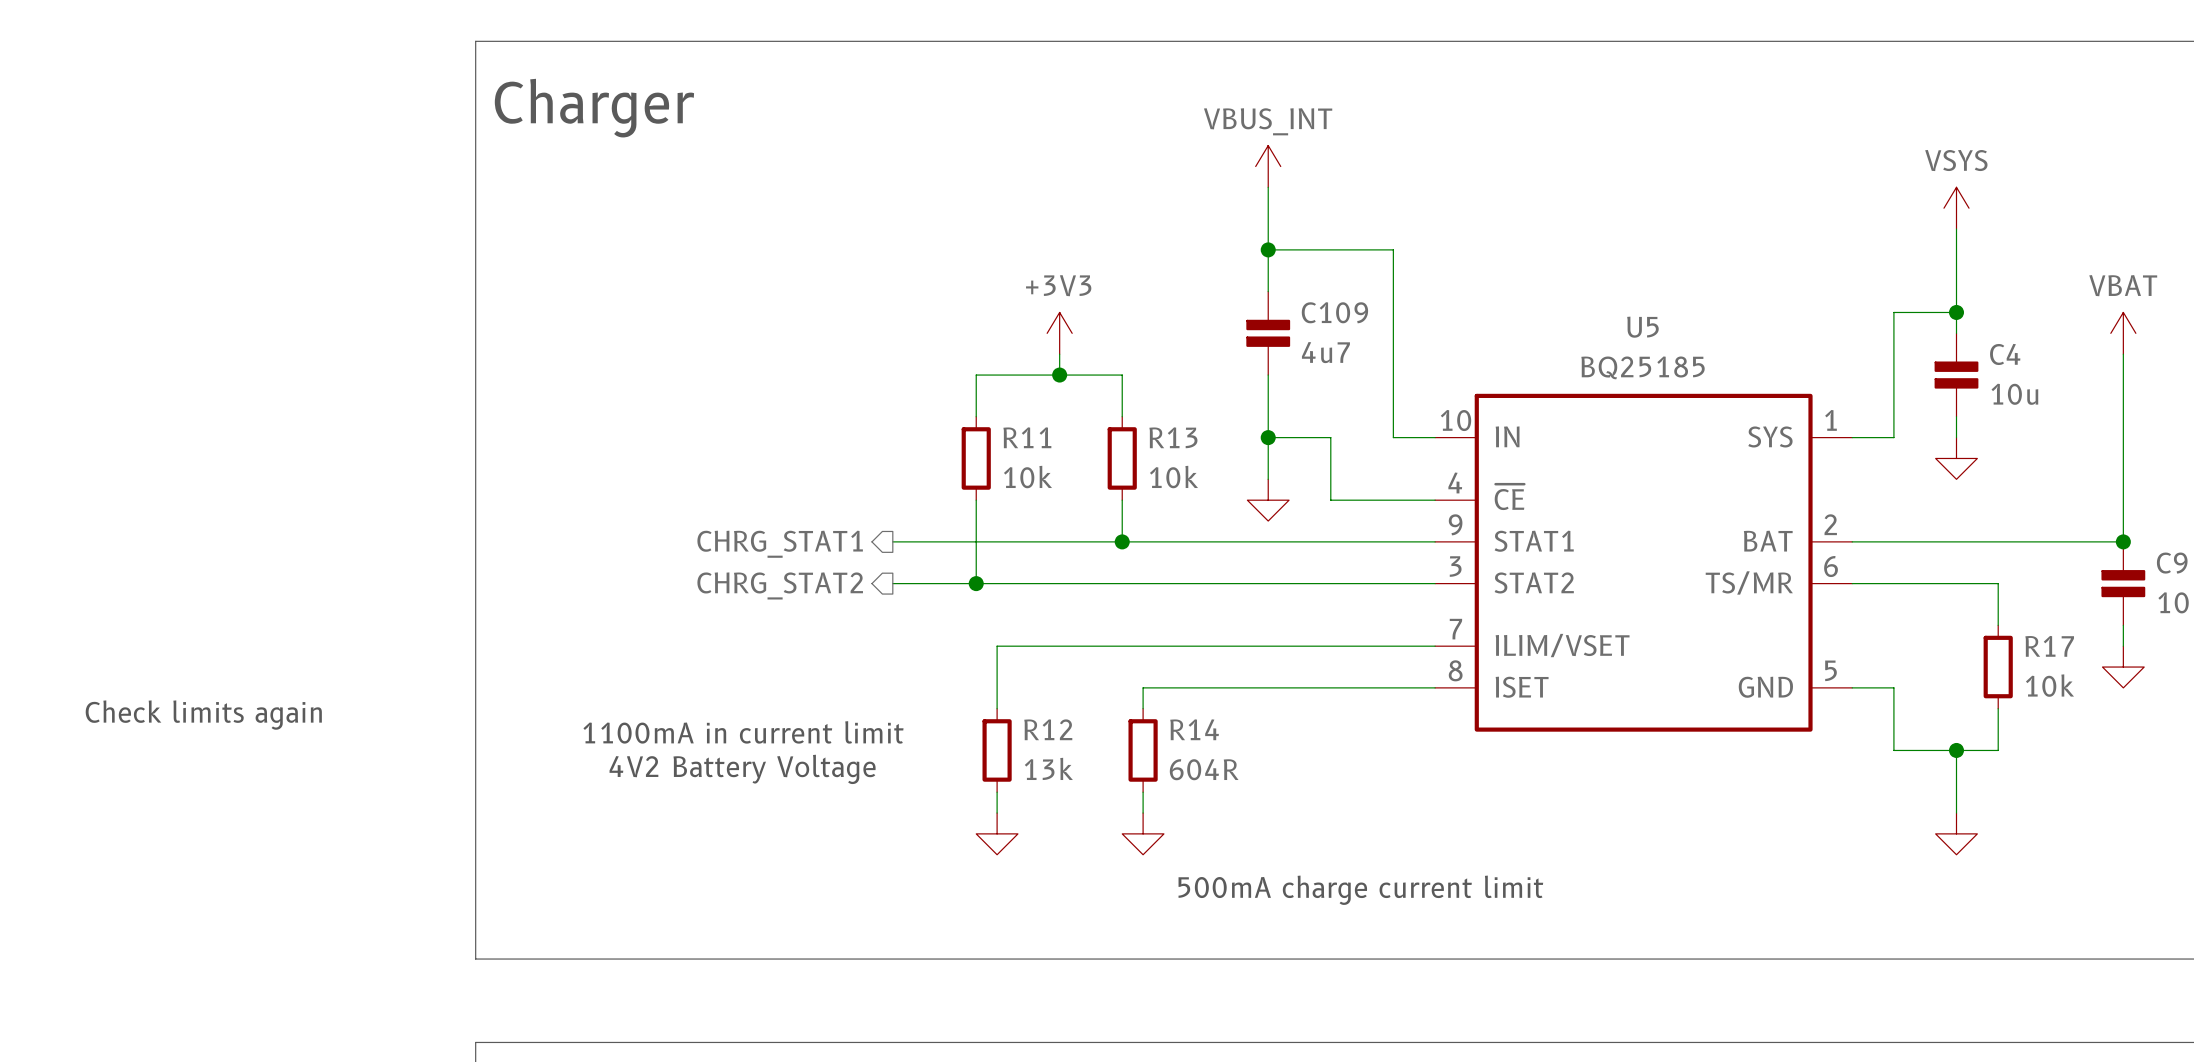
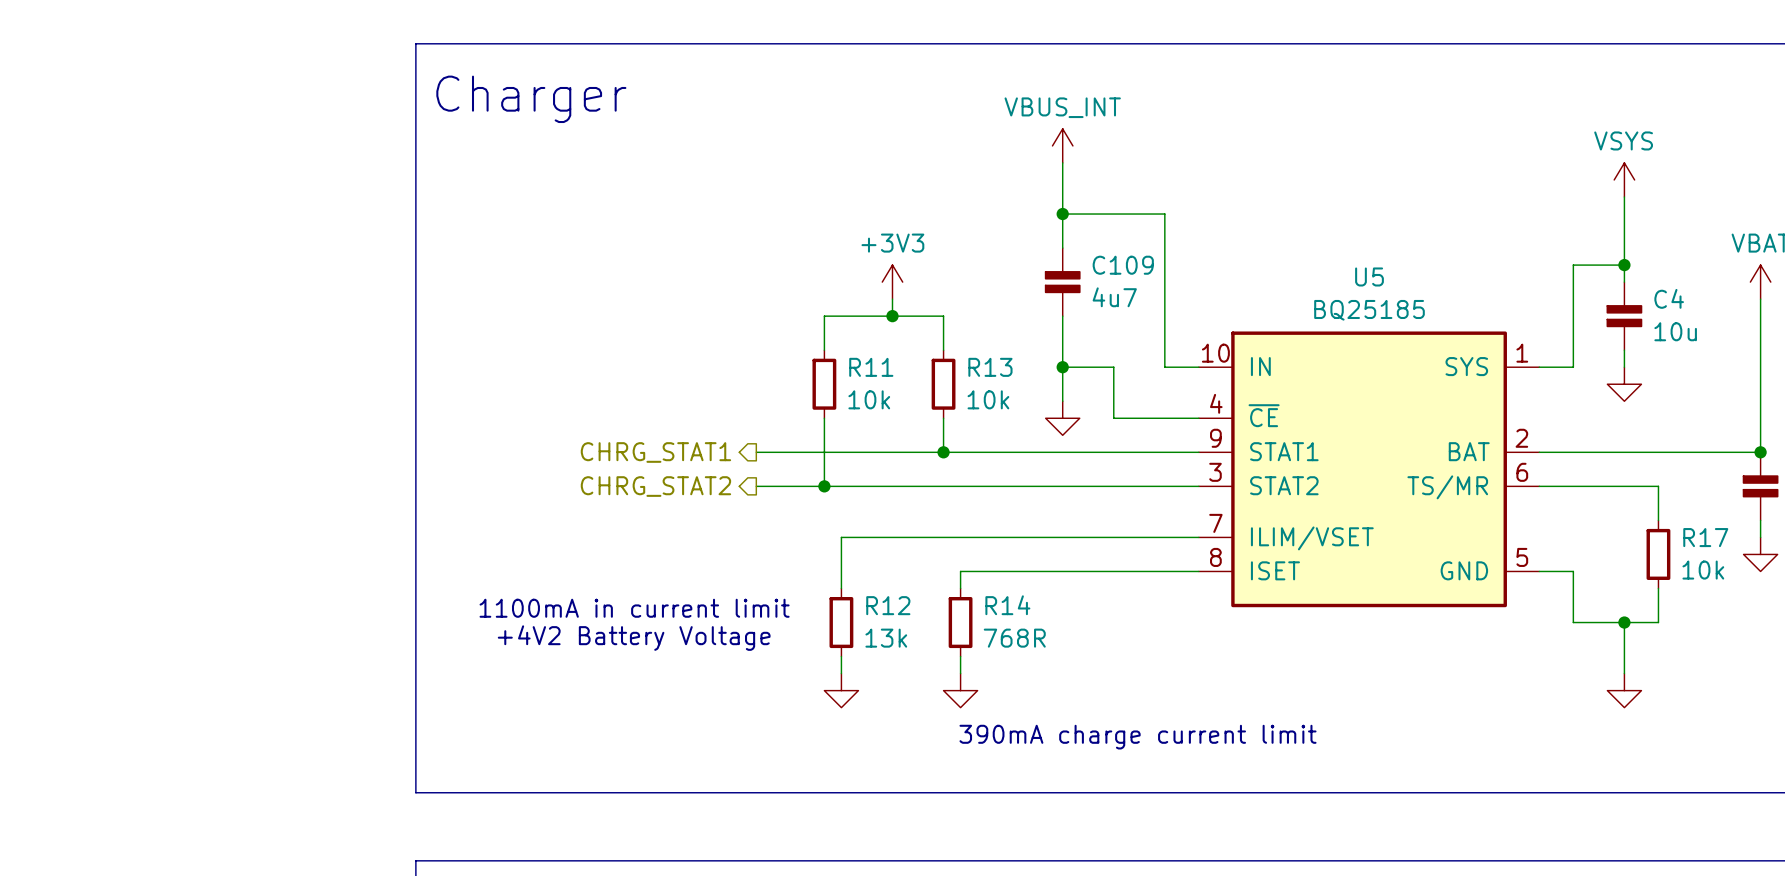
text: Check limits again (203, 715) -> none
text: 4V2 Battery Voltage (742, 769) -> +4V2 Battery Voltage (634, 638)
R14 value: 604R (1204, 769) -> 768R (1014, 638)
text: 500mA charge current limit (1360, 890) -> 390mA charge current limit (1138, 737)

